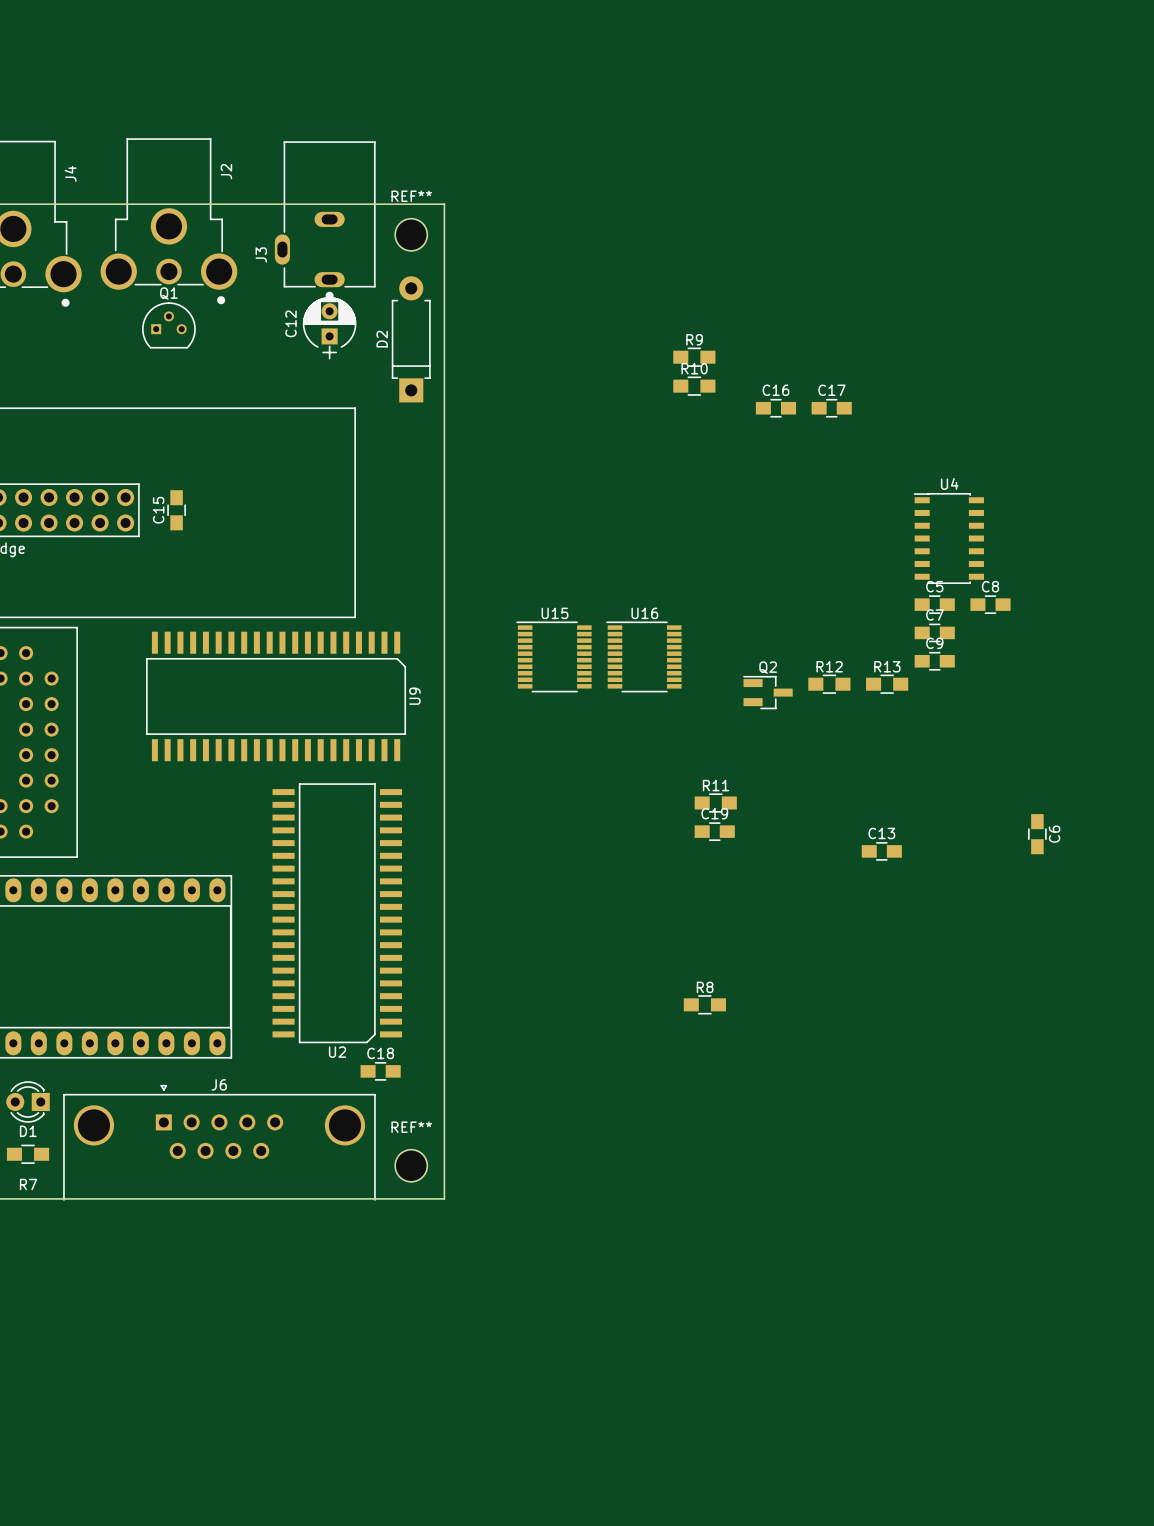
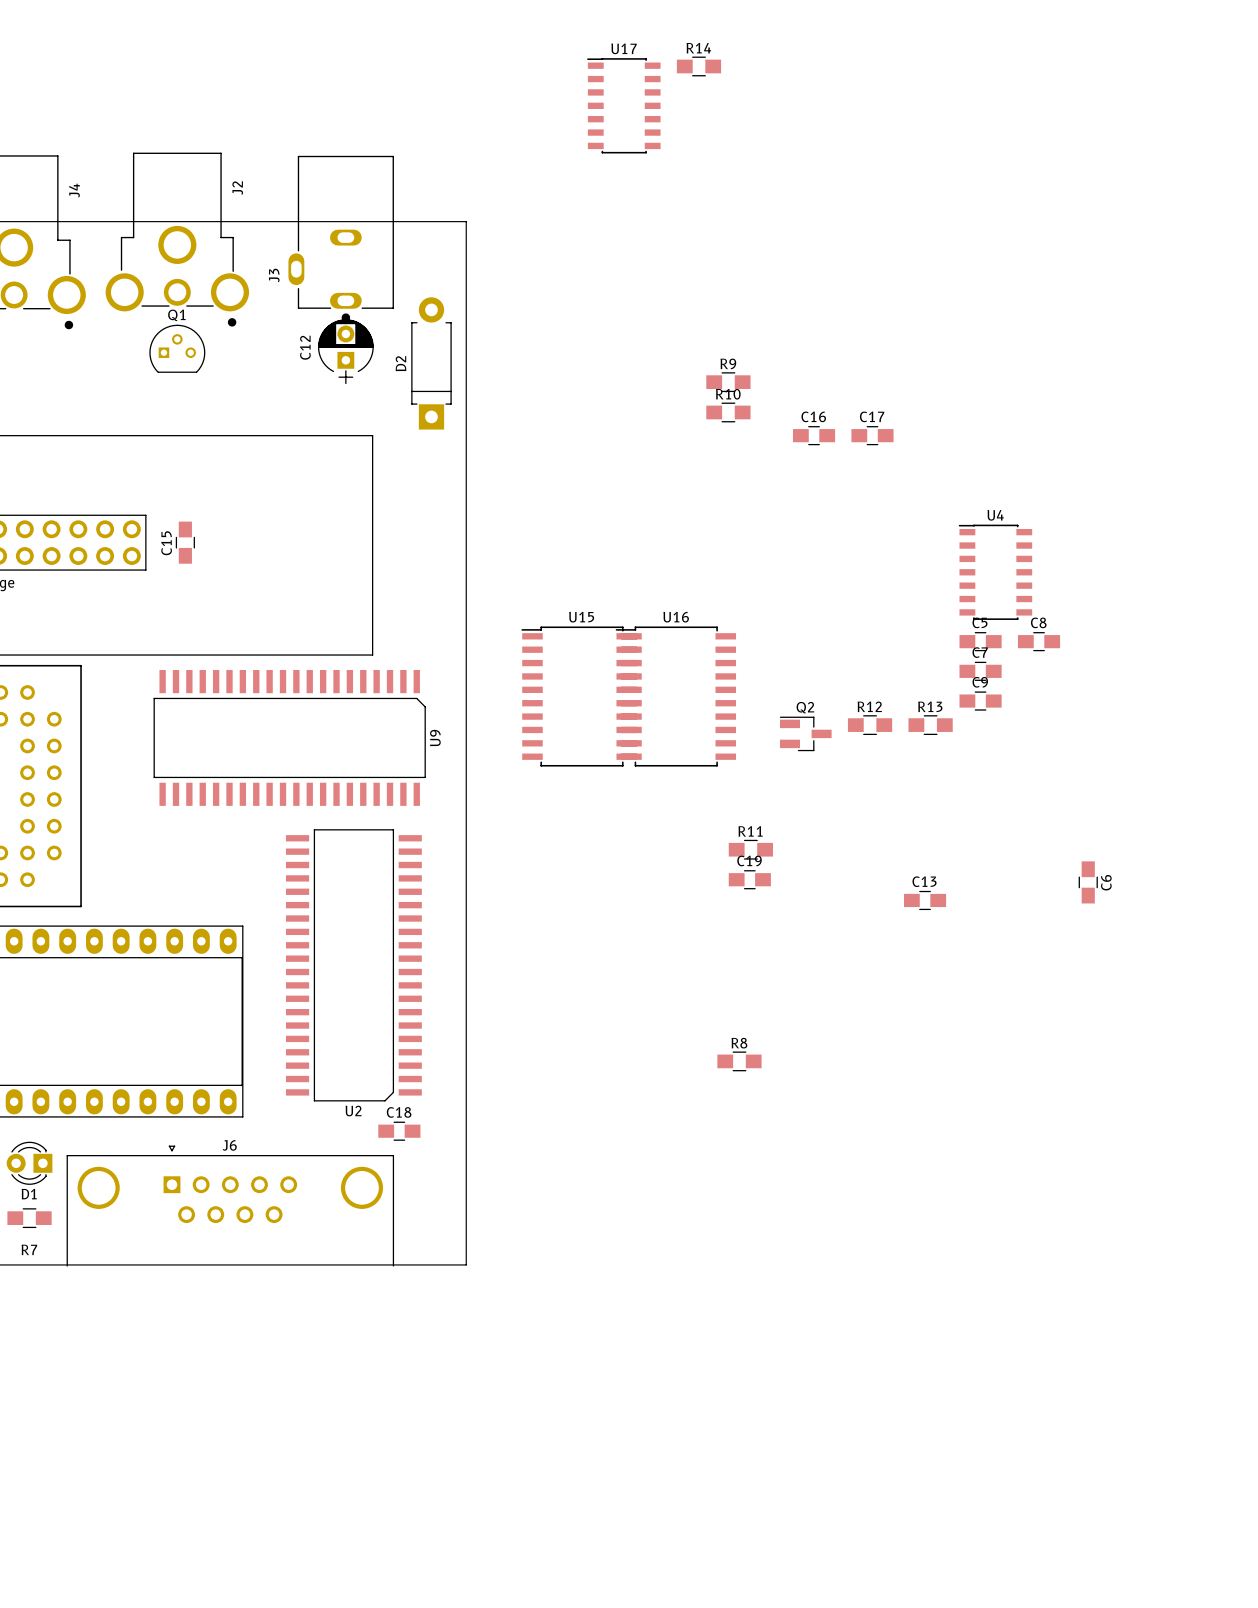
R14: none -> (699, 66)
U17: none -> (623, 105)
REF**: (411, 234) -> none
U15 name position: U15 (554, 613) -> U15 (581, 617)
U16 name position: U16 (644, 613) -> U16 (676, 617)
U15 footprint: [516, 621, 592, 693] -> [521, 626, 642, 767]
U16 footprint: [606, 621, 682, 693] -> [615, 626, 737, 767]
REF**: (411, 1165) -> none

